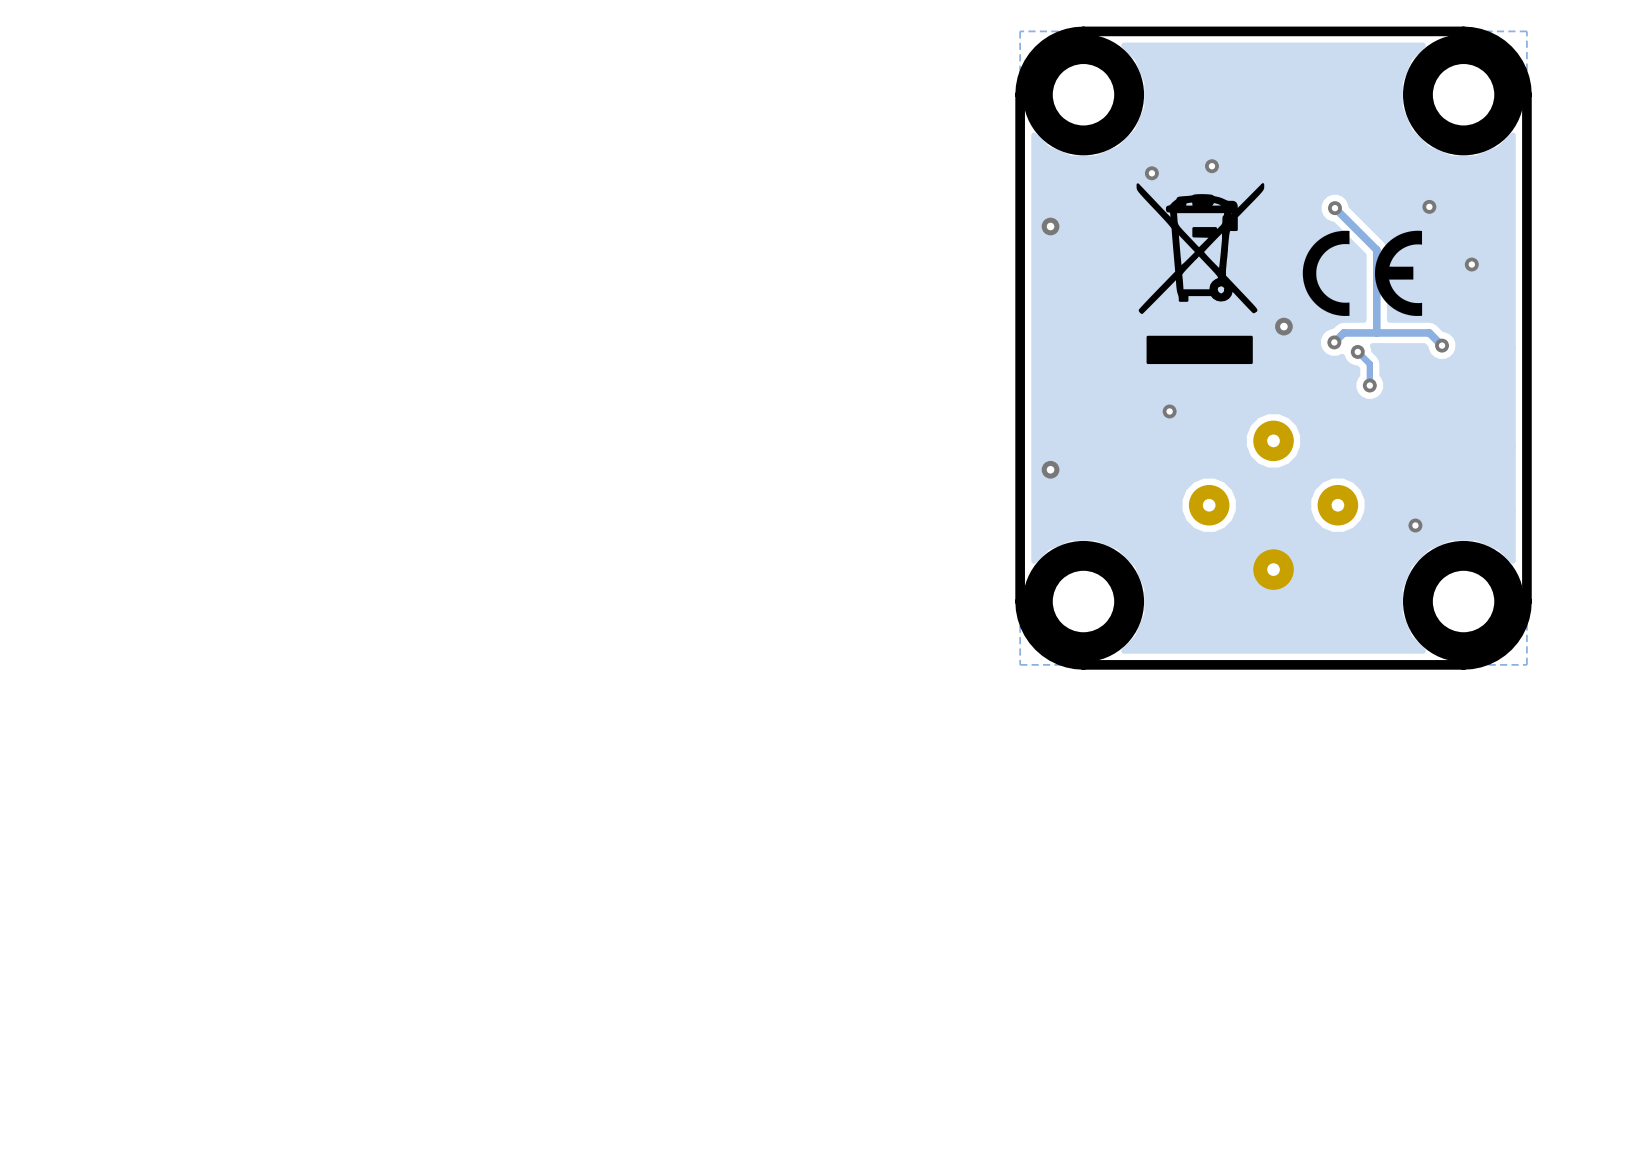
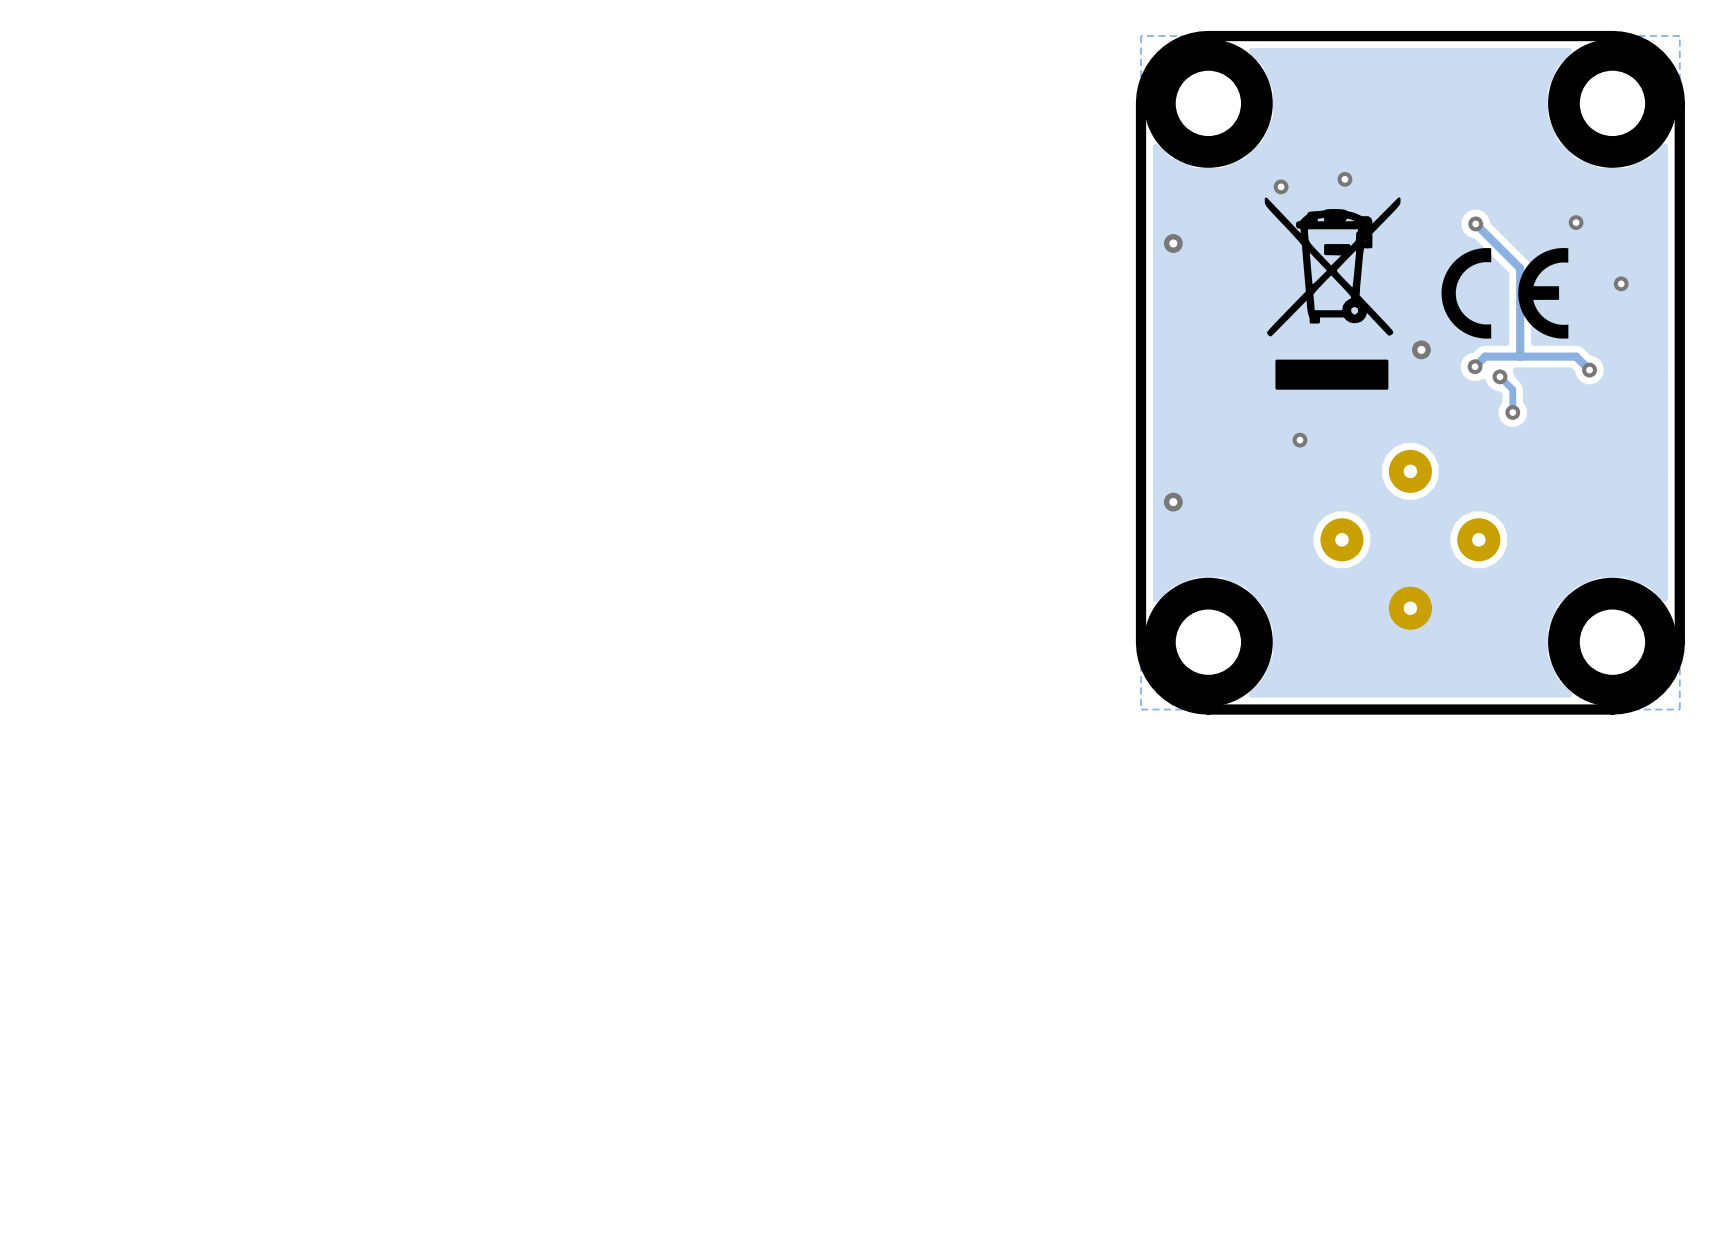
via: (1415, 525) -> none

